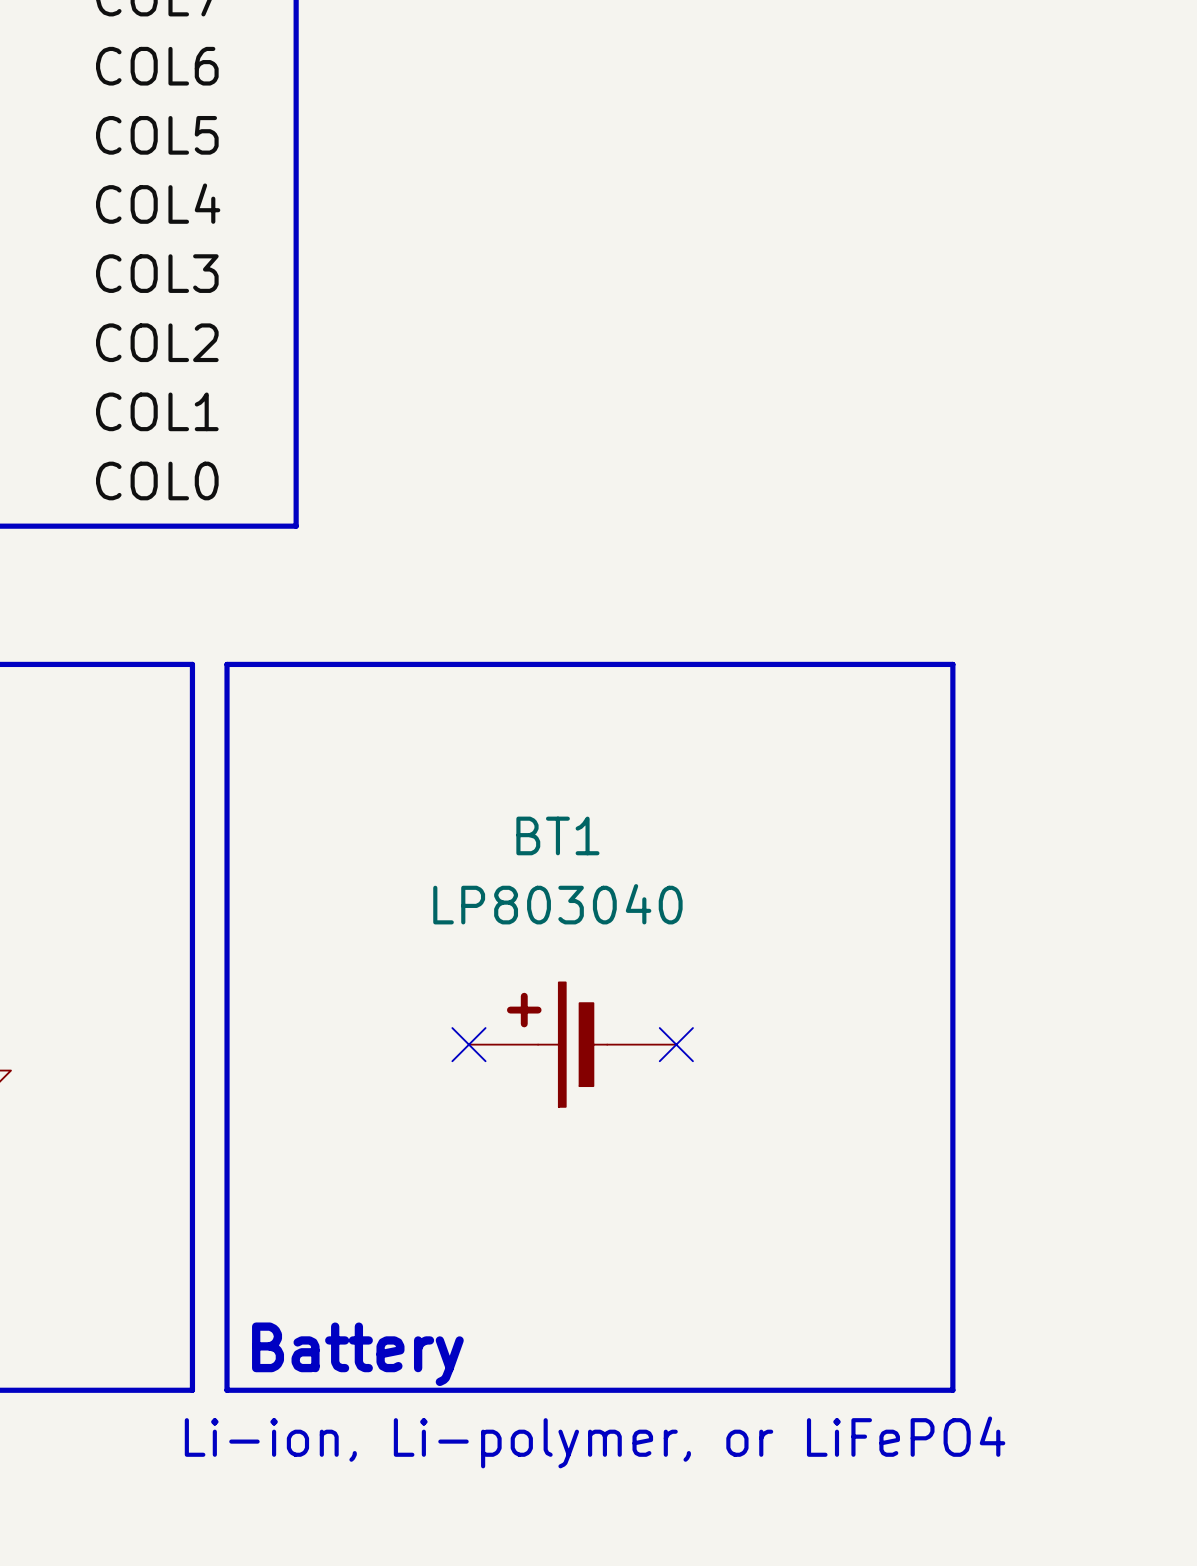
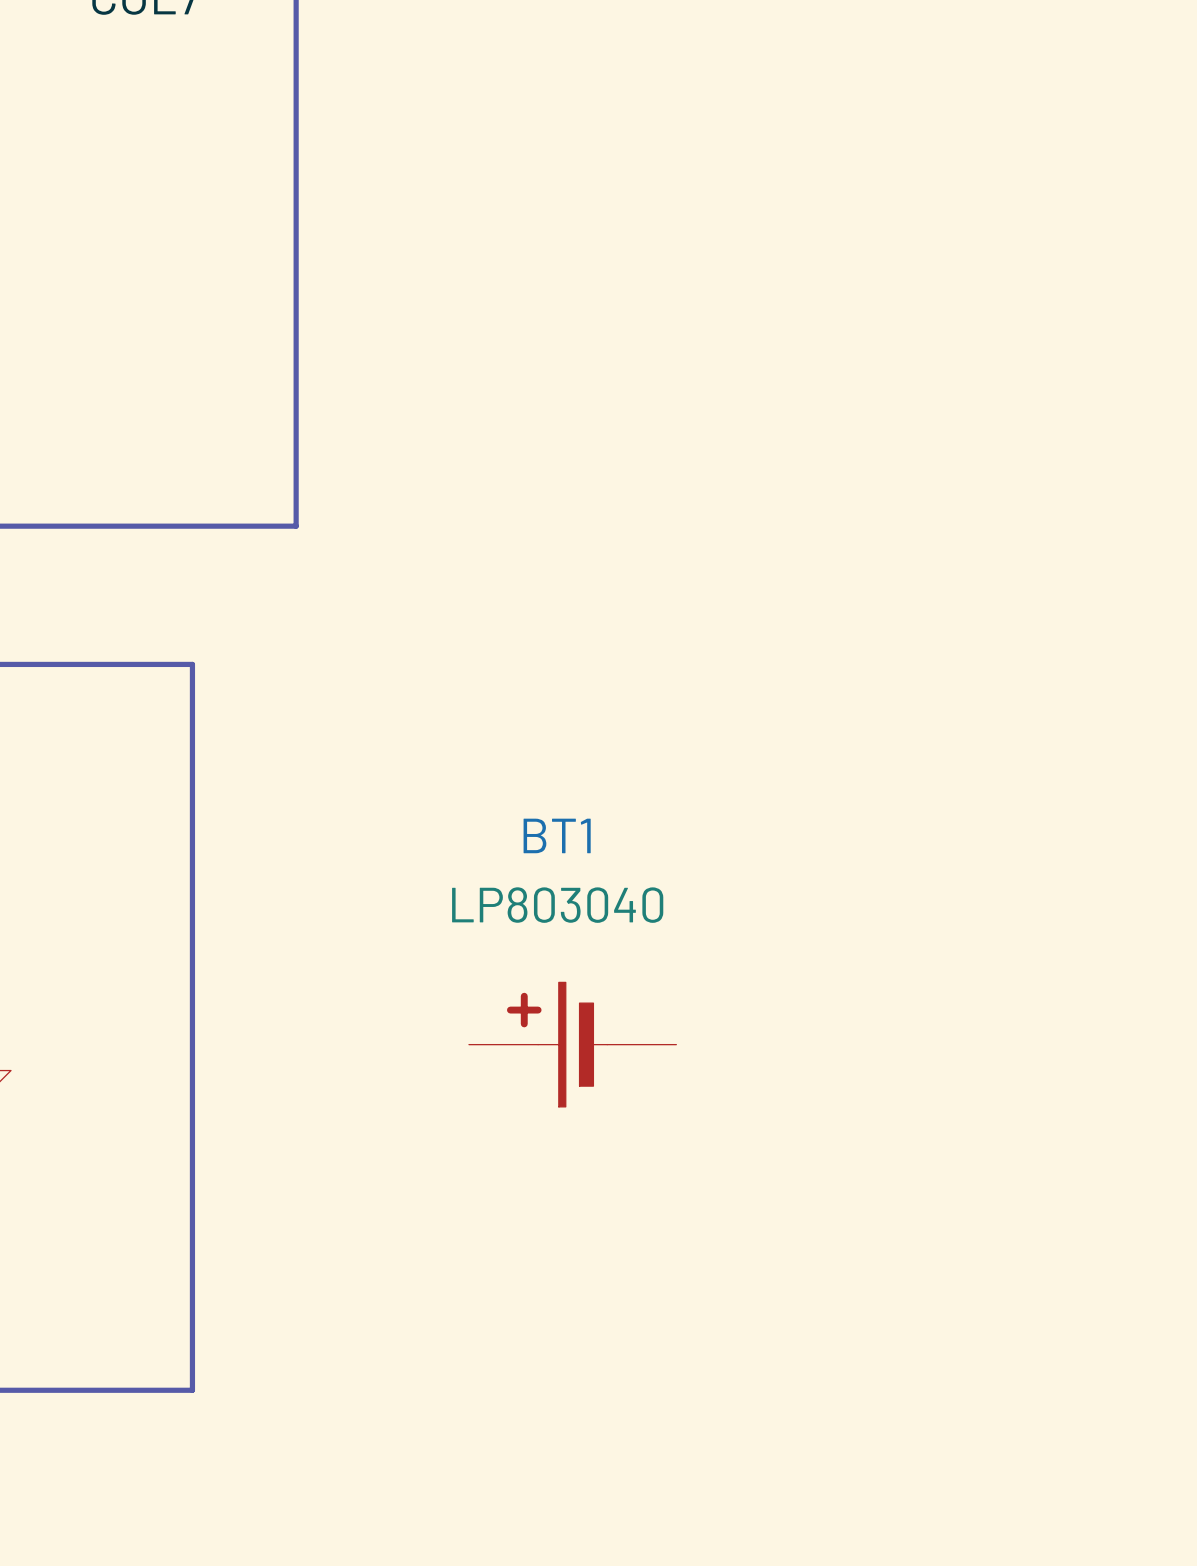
label: COL6 (157, 66) -> none
label: COL5 (157, 135) -> none
label: COL4 (158, 203) -> none
label: COL3 (157, 273) -> none
label: COL2 (157, 342) -> none
label: COL1 (157, 411) -> none
label: COL0 (157, 480) -> none
line: (227, 664) (952, 664) (952, 1390) (227, 1390) (227, 664) -> none
no-connect mark: (468, 1044) -> none
no-connect mark: (676, 1044) -> none
text: Battery (357, 1354) -> none
text: Li-ion, Li-polymer, or LiFePO4 (595, 1442) -> none

